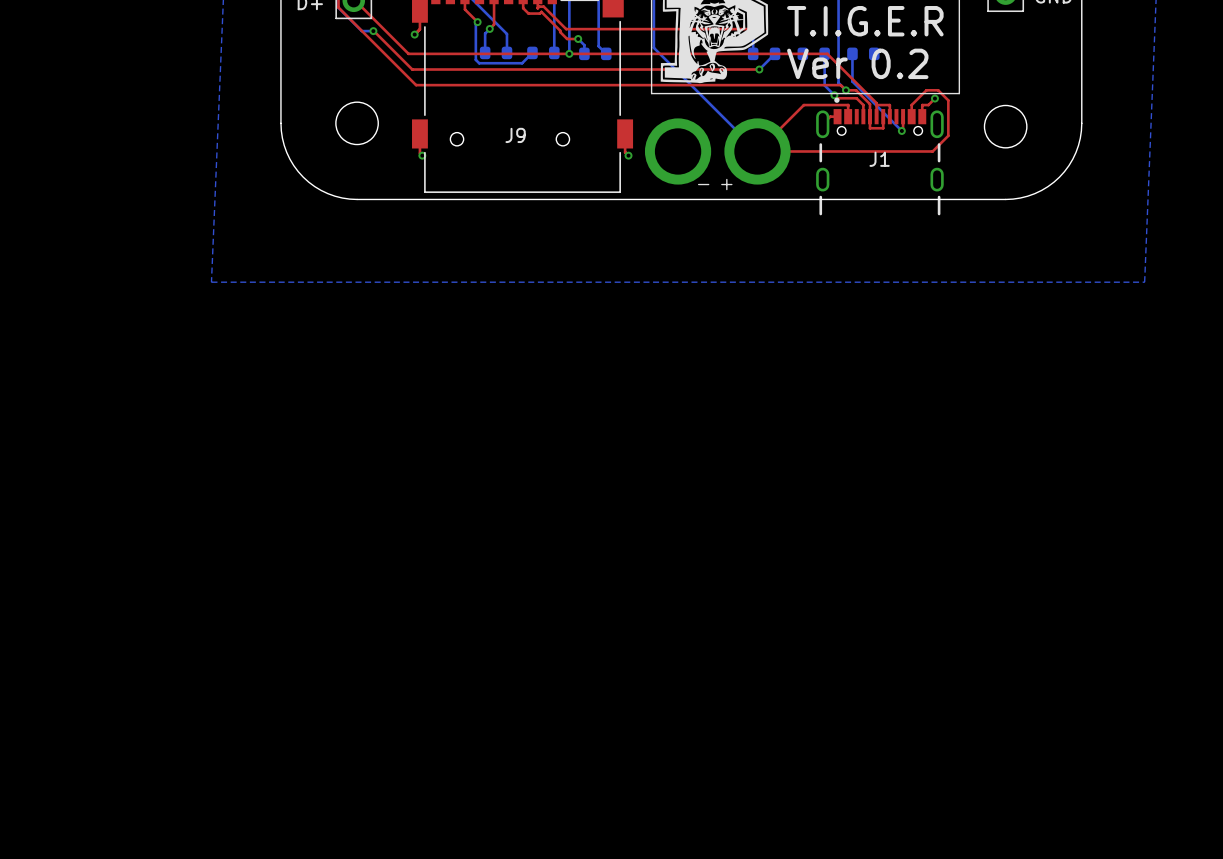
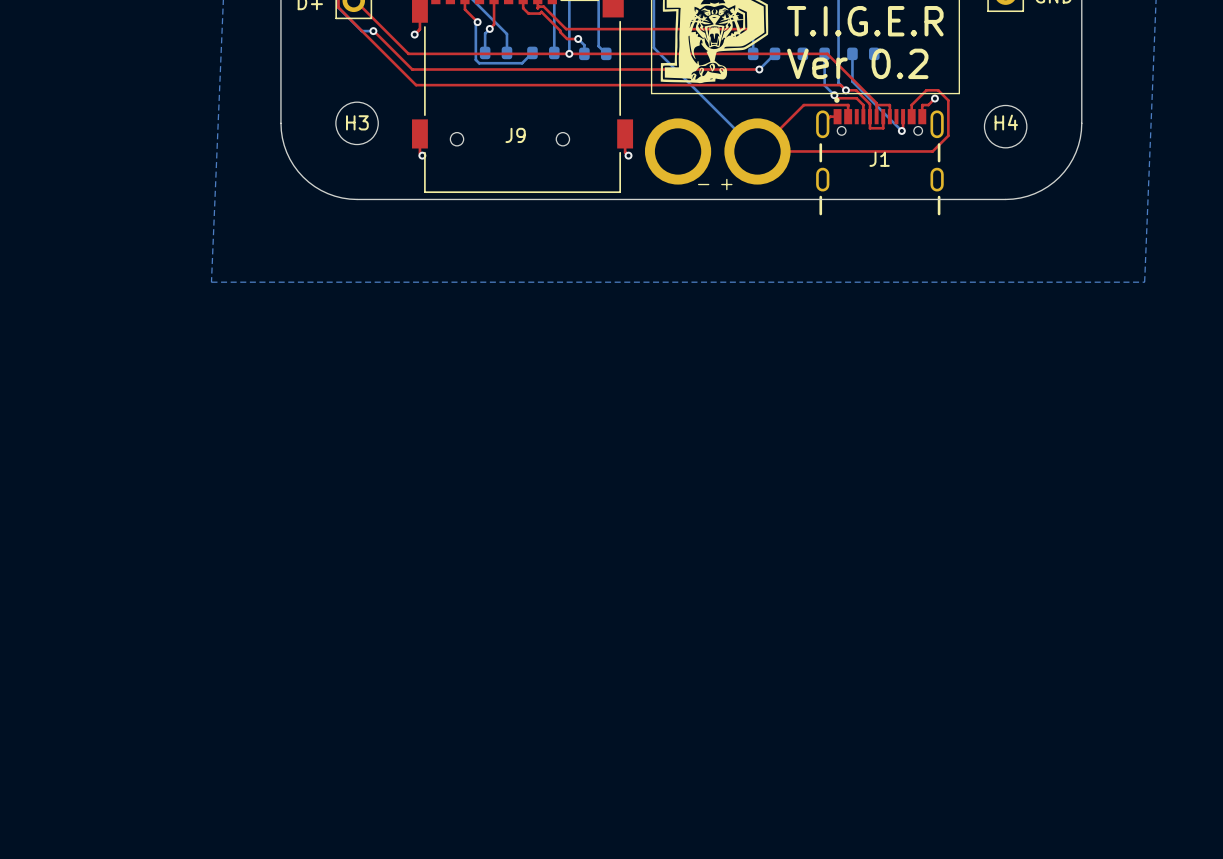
H3 name: none -> H3 (357, 122)
H4 name: none -> H4 (1006, 122)

